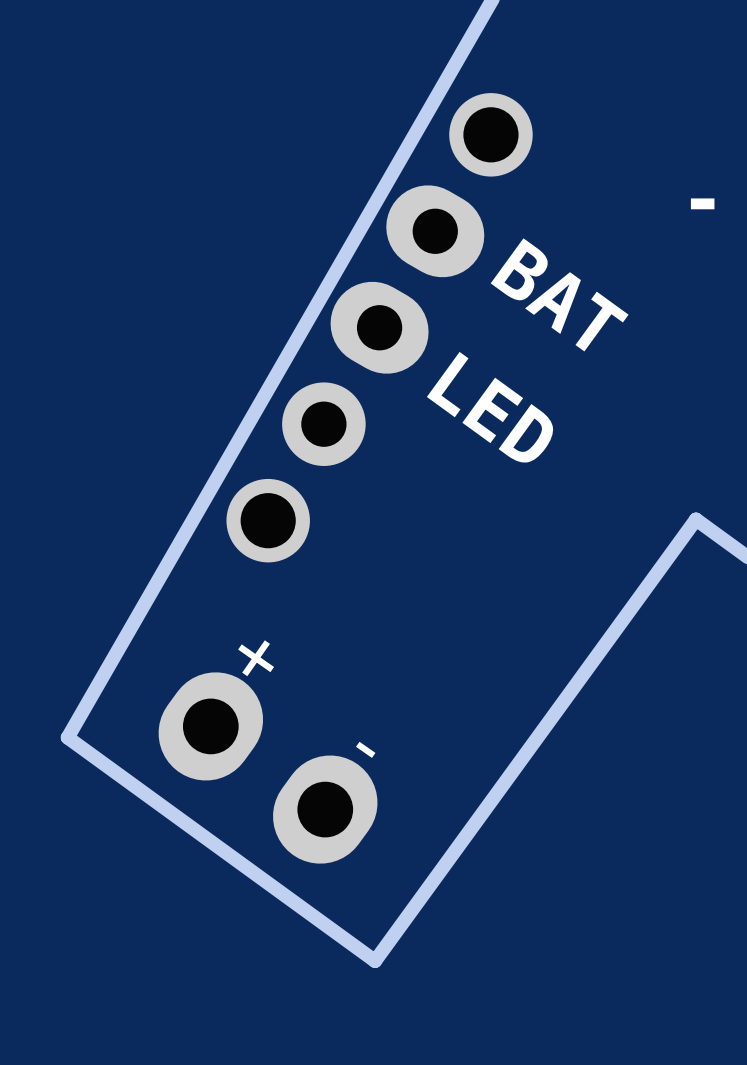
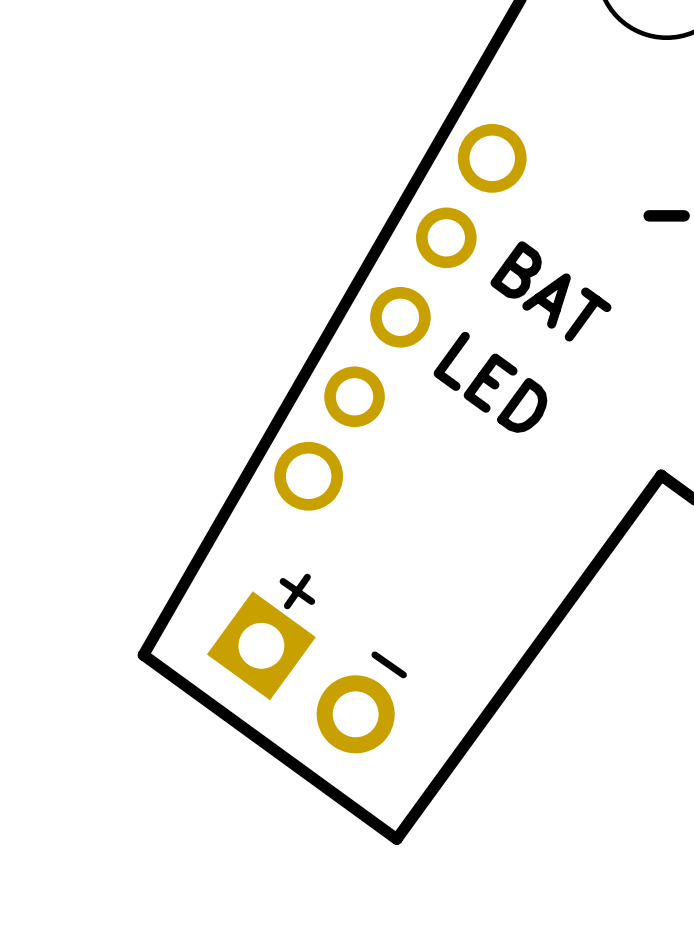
part footprint: [226, 93, 533, 563] -> [274, 123, 527, 511]
part footprint: [158, 672, 378, 864] -> [206, 591, 395, 754]

